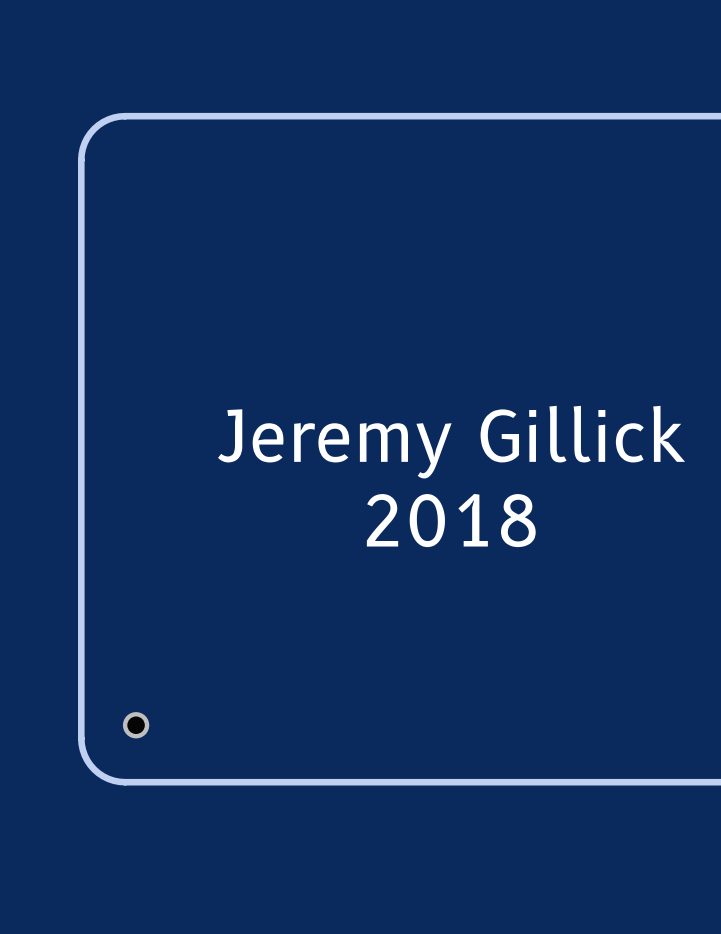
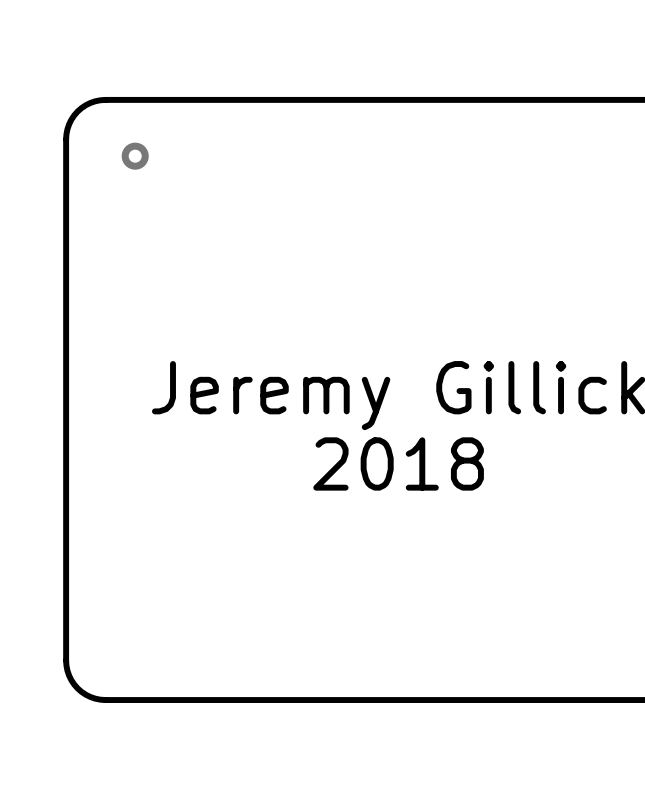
via: none -> (135, 156)
via: (136, 725) -> none

